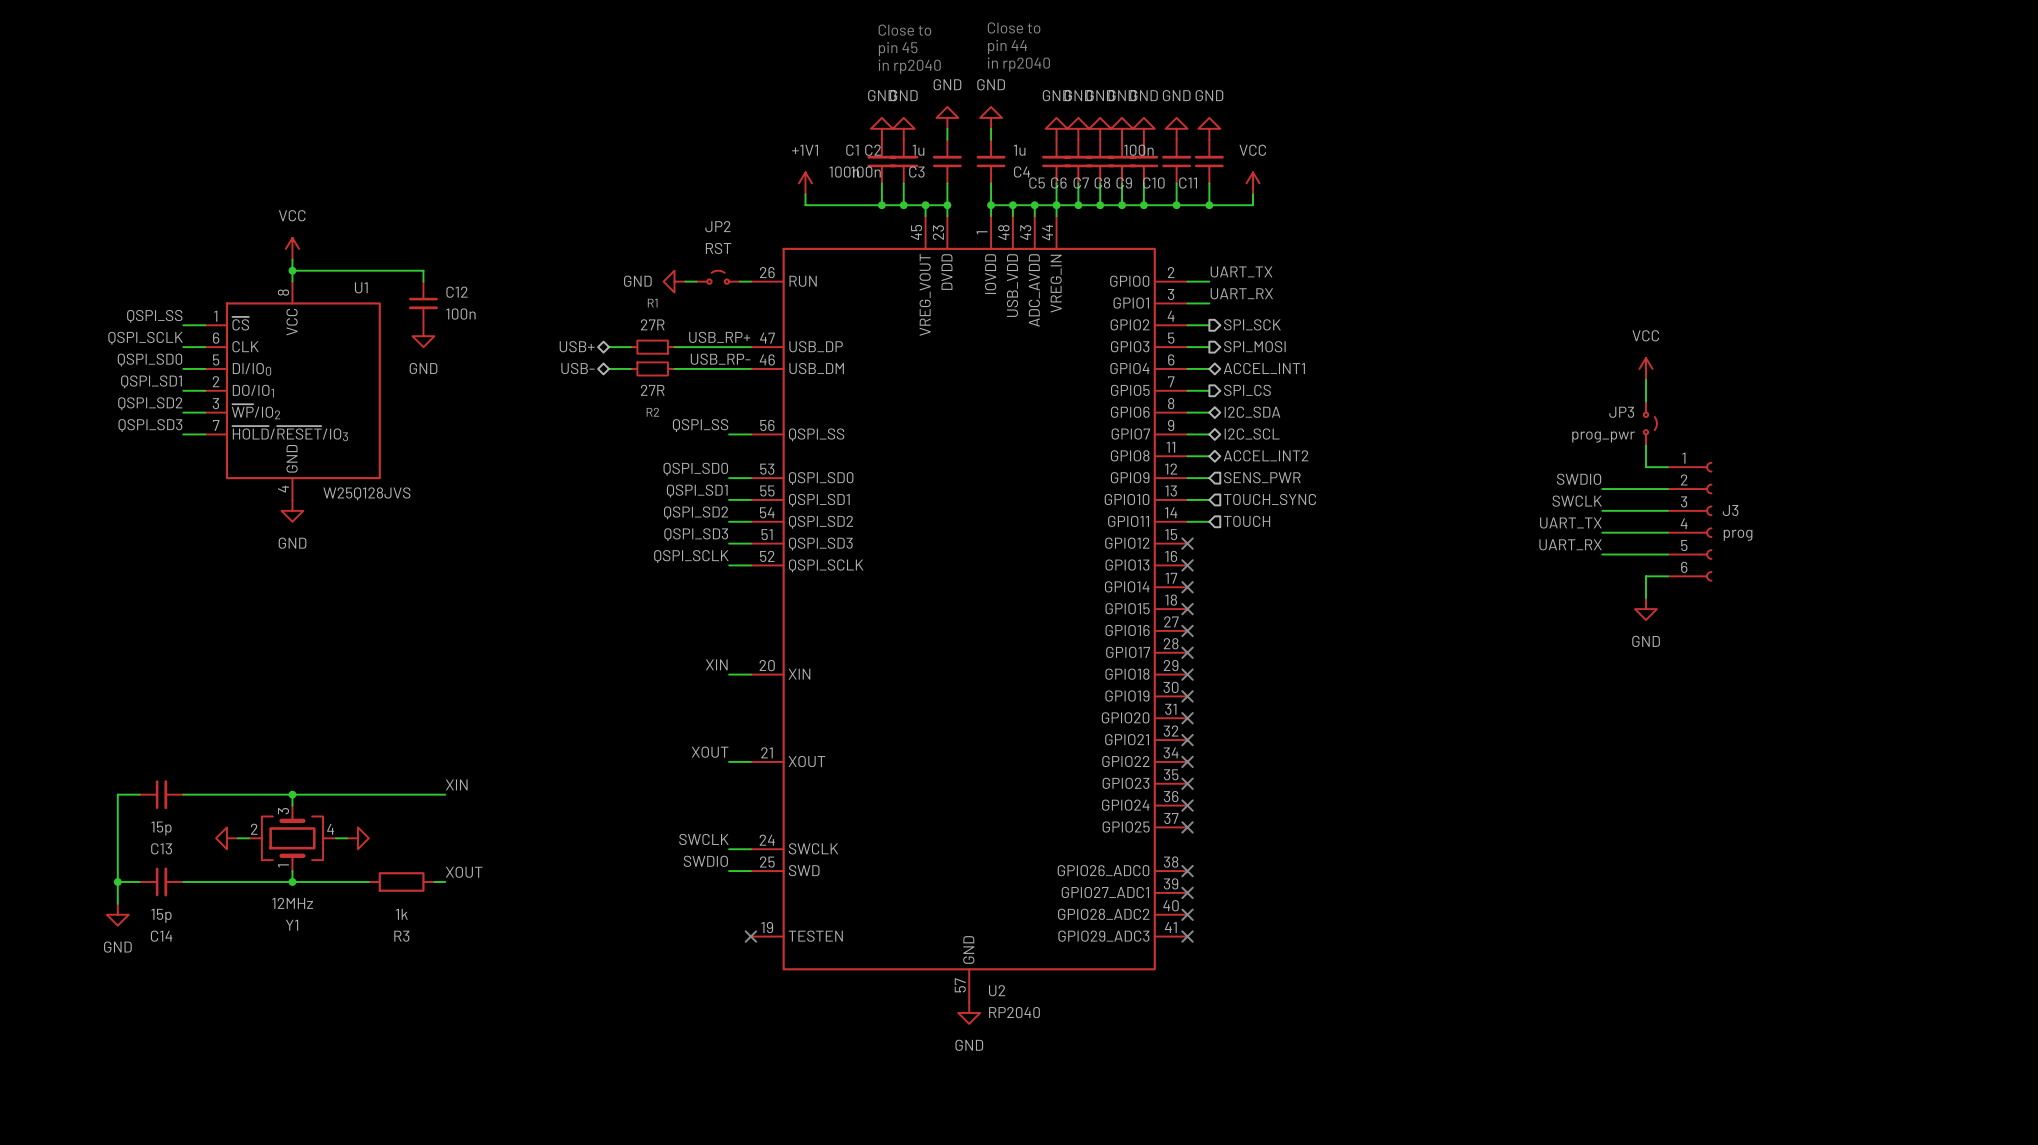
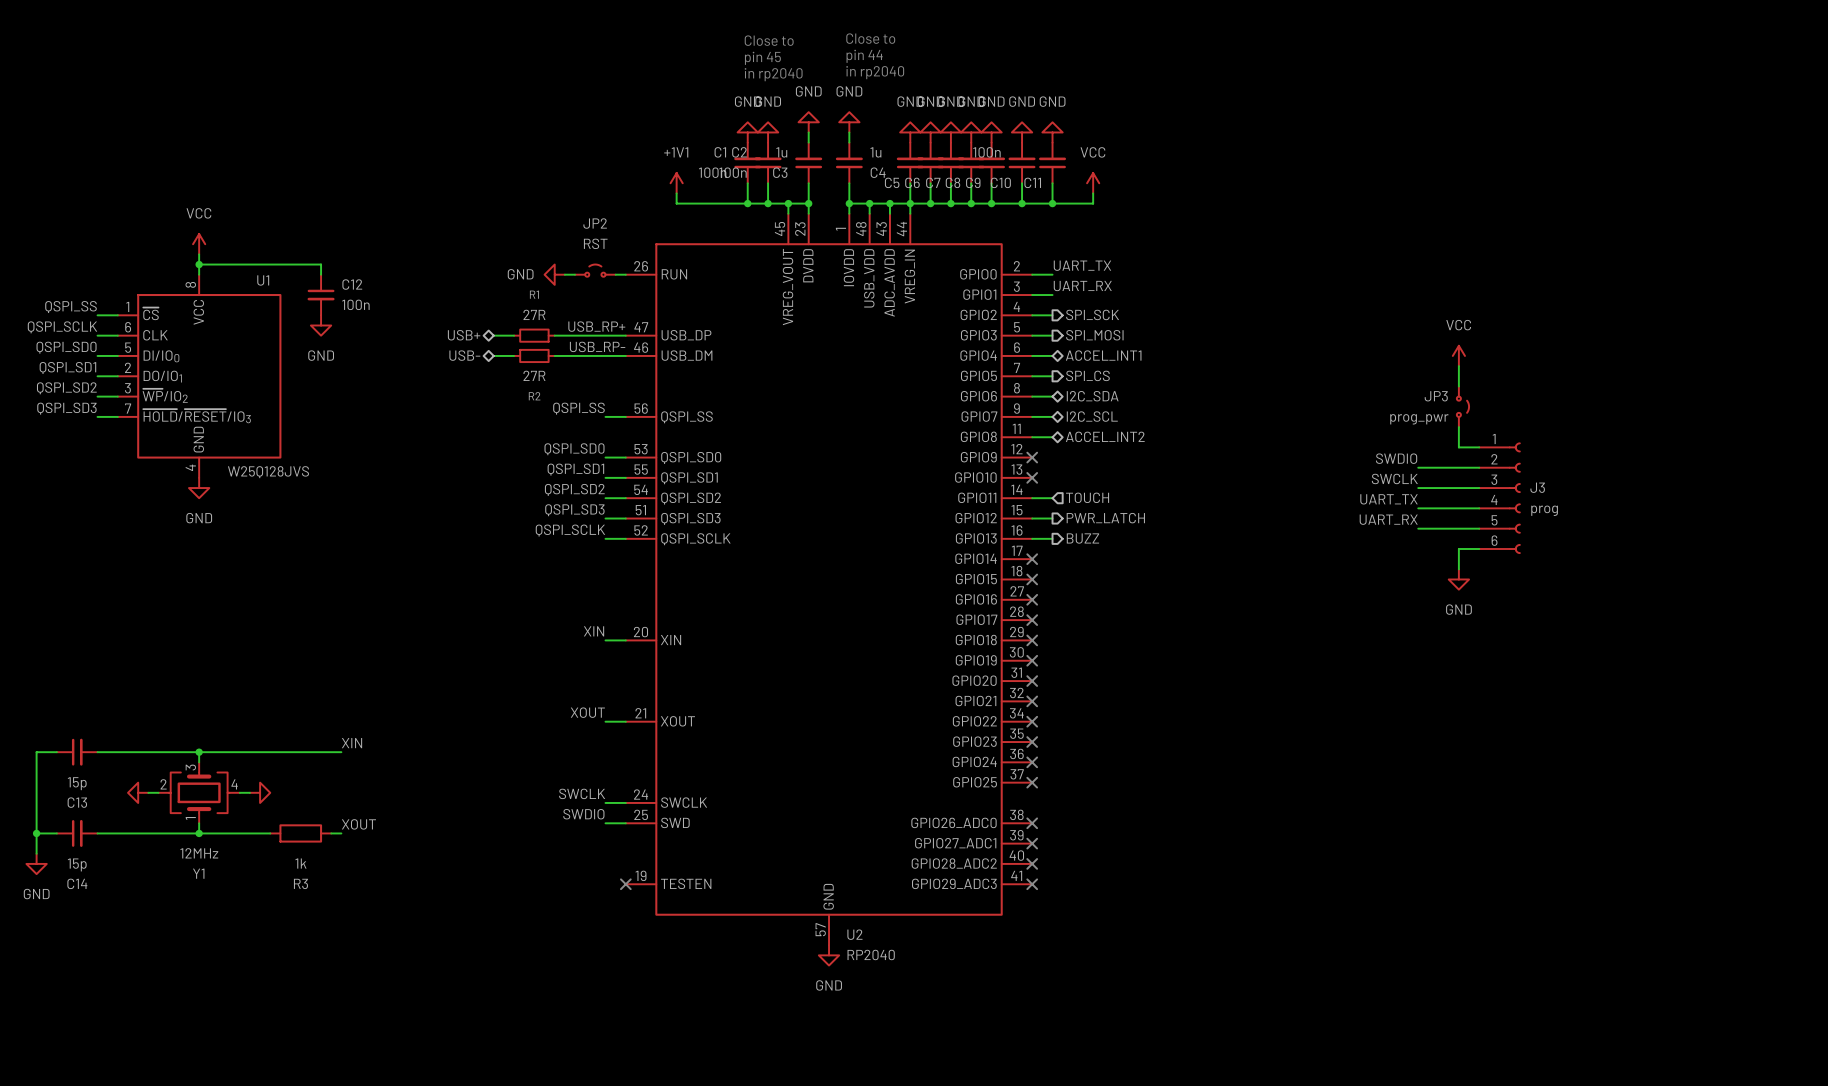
hierarchical label: SENS_PWR (1262, 477) -> none
wire: (1187, 478) (1209, 478) -> (1032, 538) (1052, 538)
no-connect mark: none -> (1032, 457)
wire: (1187, 499) (1209, 499) -> (1032, 518) (1052, 518)
no-connect mark: none -> (1032, 477)
hierarchical label: TOUCH_SYNC (1269, 499) -> none
no-connect mark: (1187, 543) -> none
hierarchical label: none -> PWR_LATCH (1105, 518)
no-connect mark: (1187, 565) -> none
hierarchical label: none -> BUZZ (1082, 538)

